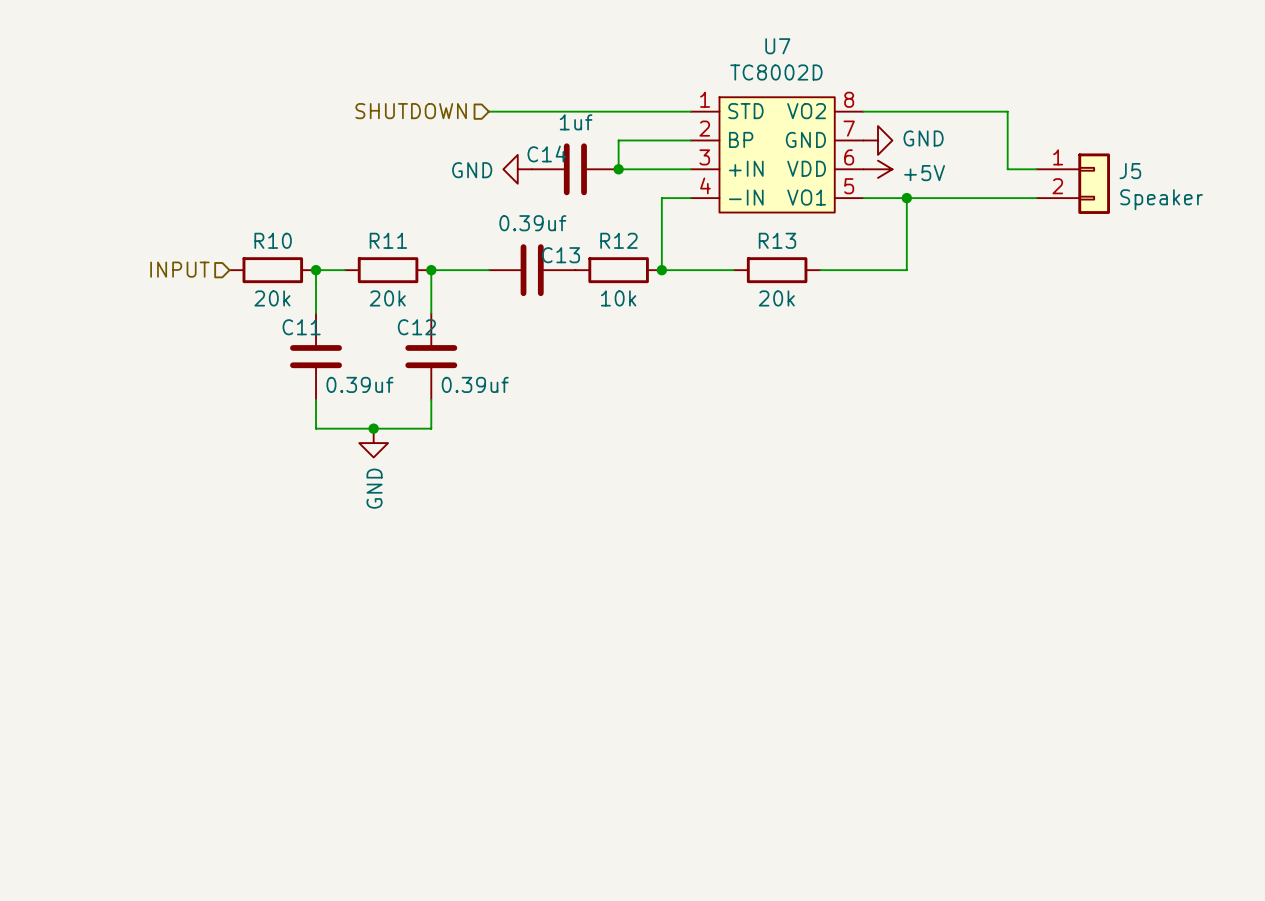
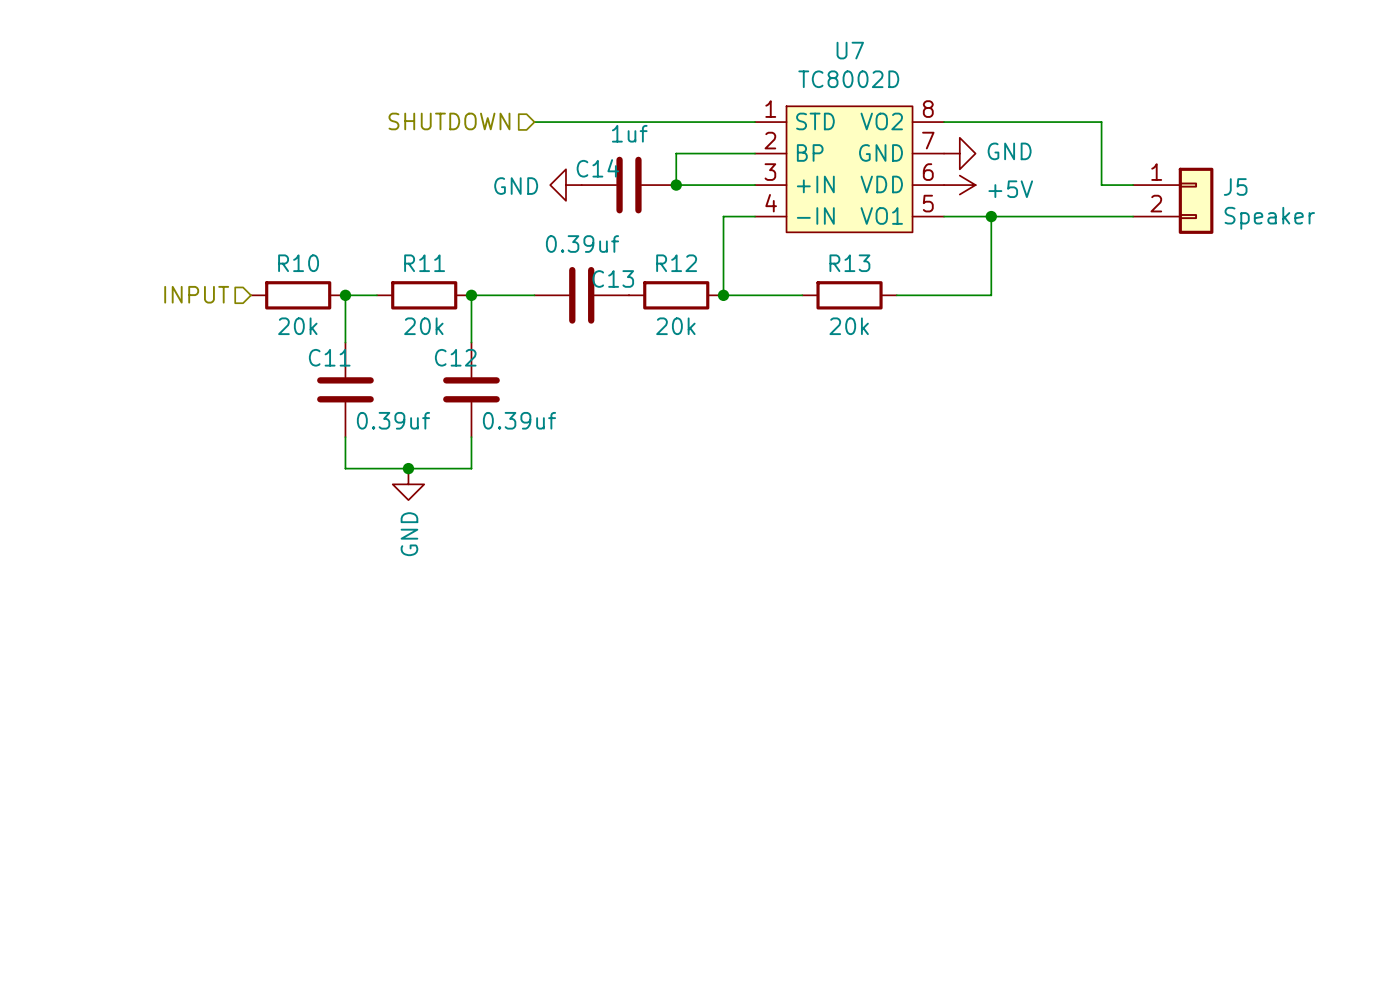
R12 value: 10k (618, 298) -> 20k (675, 326)

